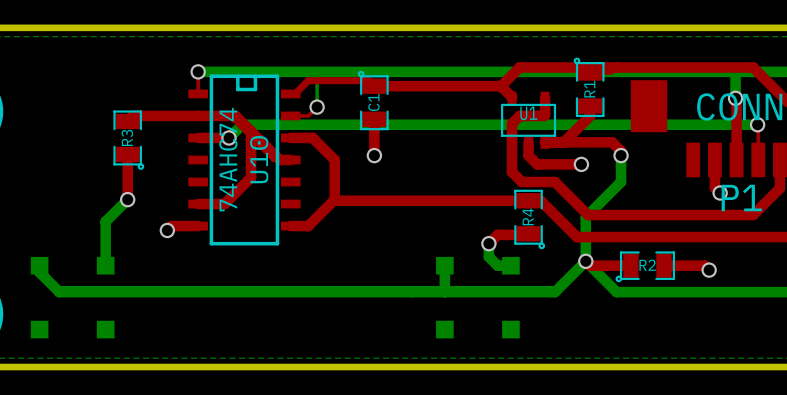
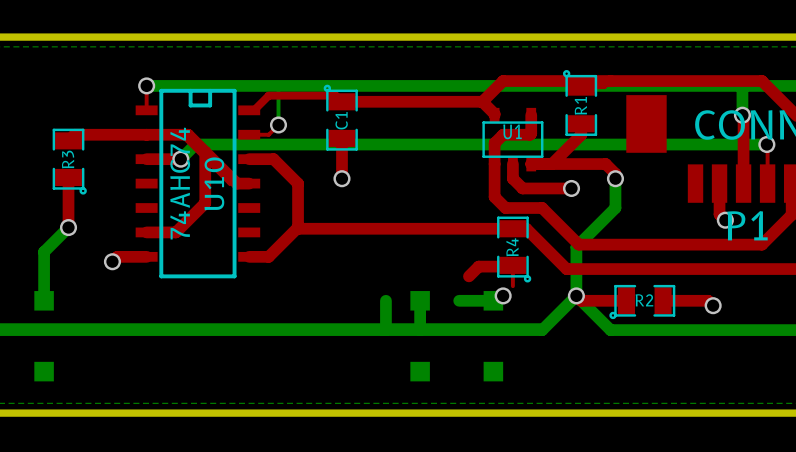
top track: none -> (512, 260) (512, 286)
bottom track: (488, 243) (488, 256) (497, 265) -> (459, 300) (478, 300)
via position: (488, 243) -> (503, 295)
bottom track: none -> (385, 325) (385, 300) (385, 330)

